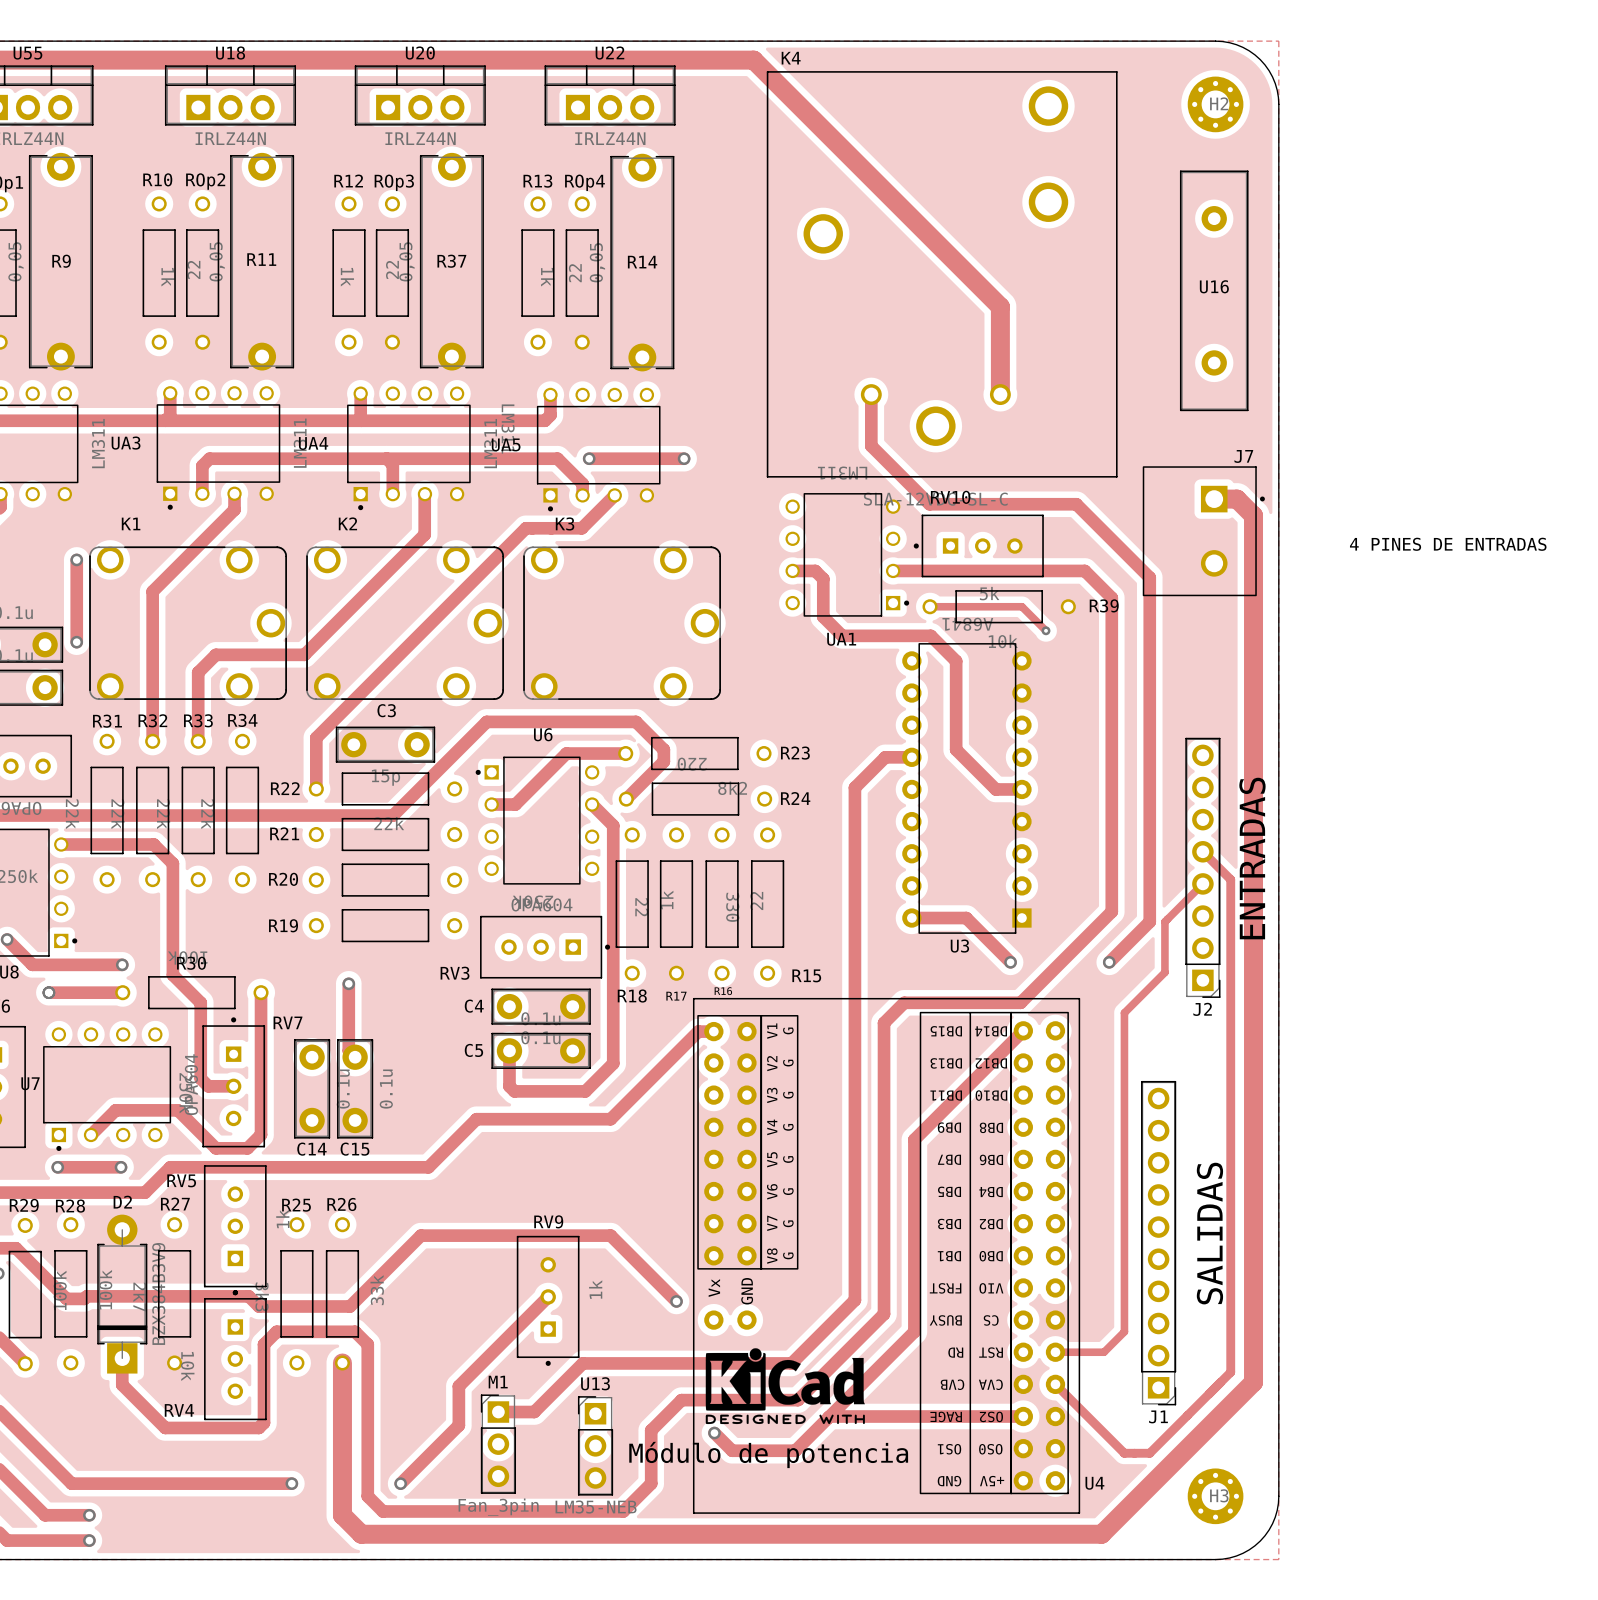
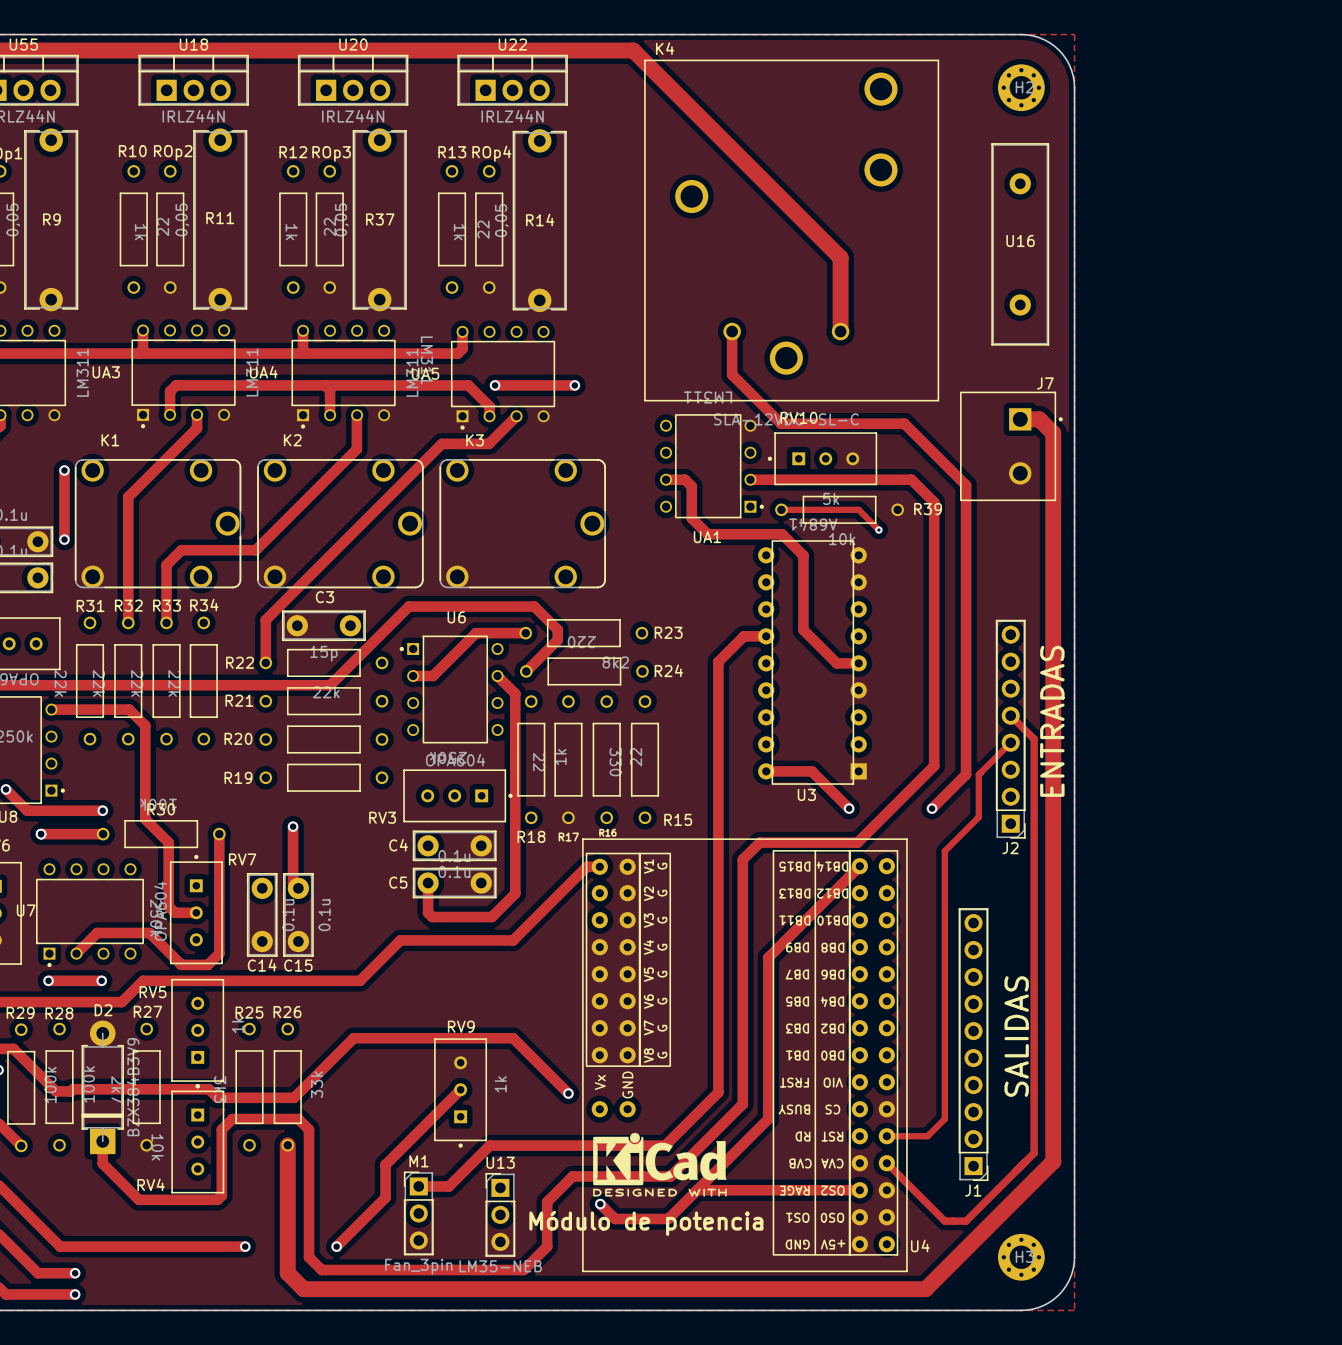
text: 4 PINES DE ENTRADAS (1448, 544) -> none

